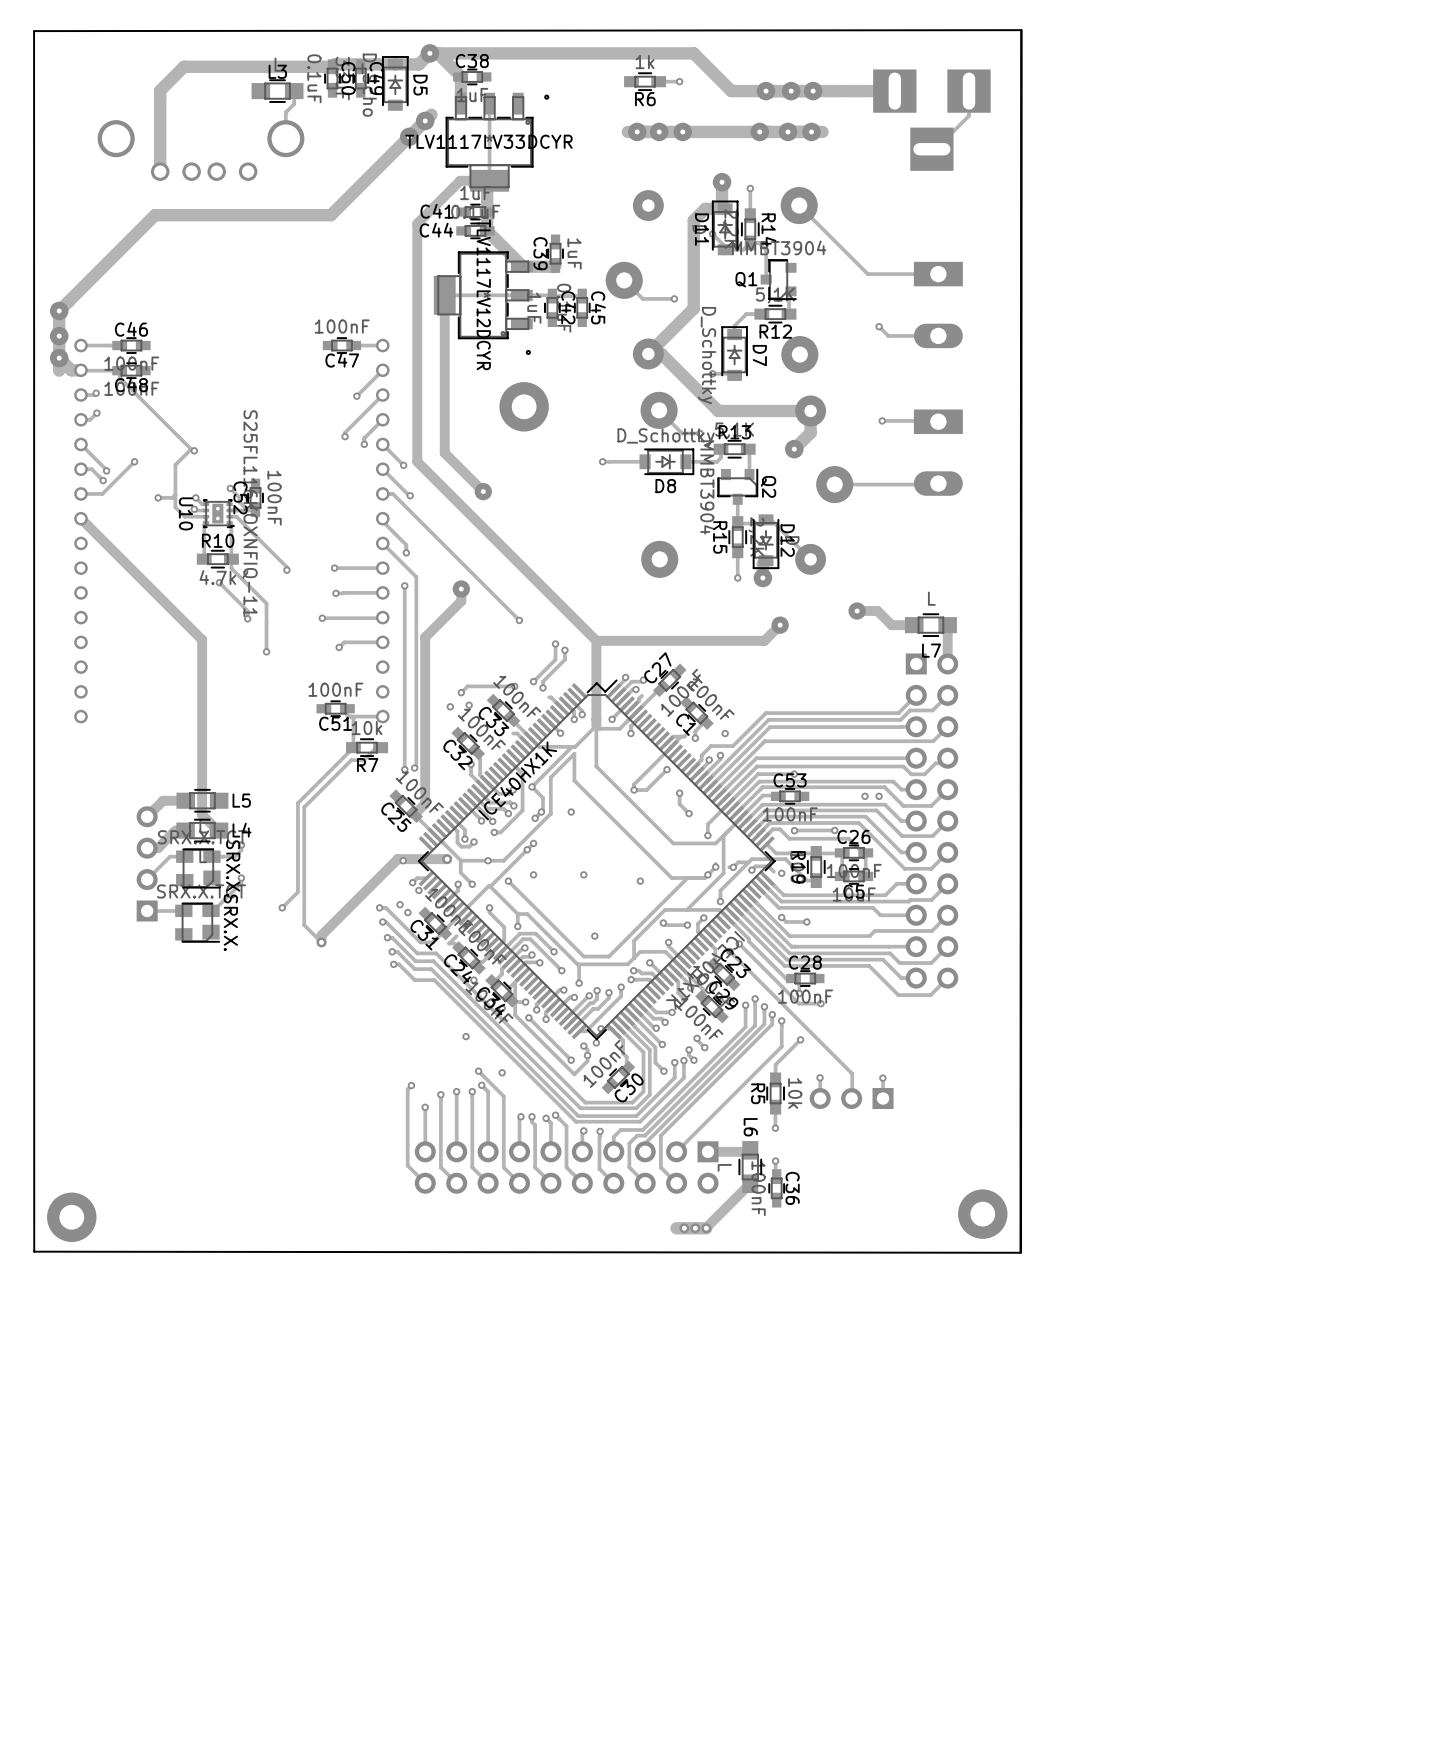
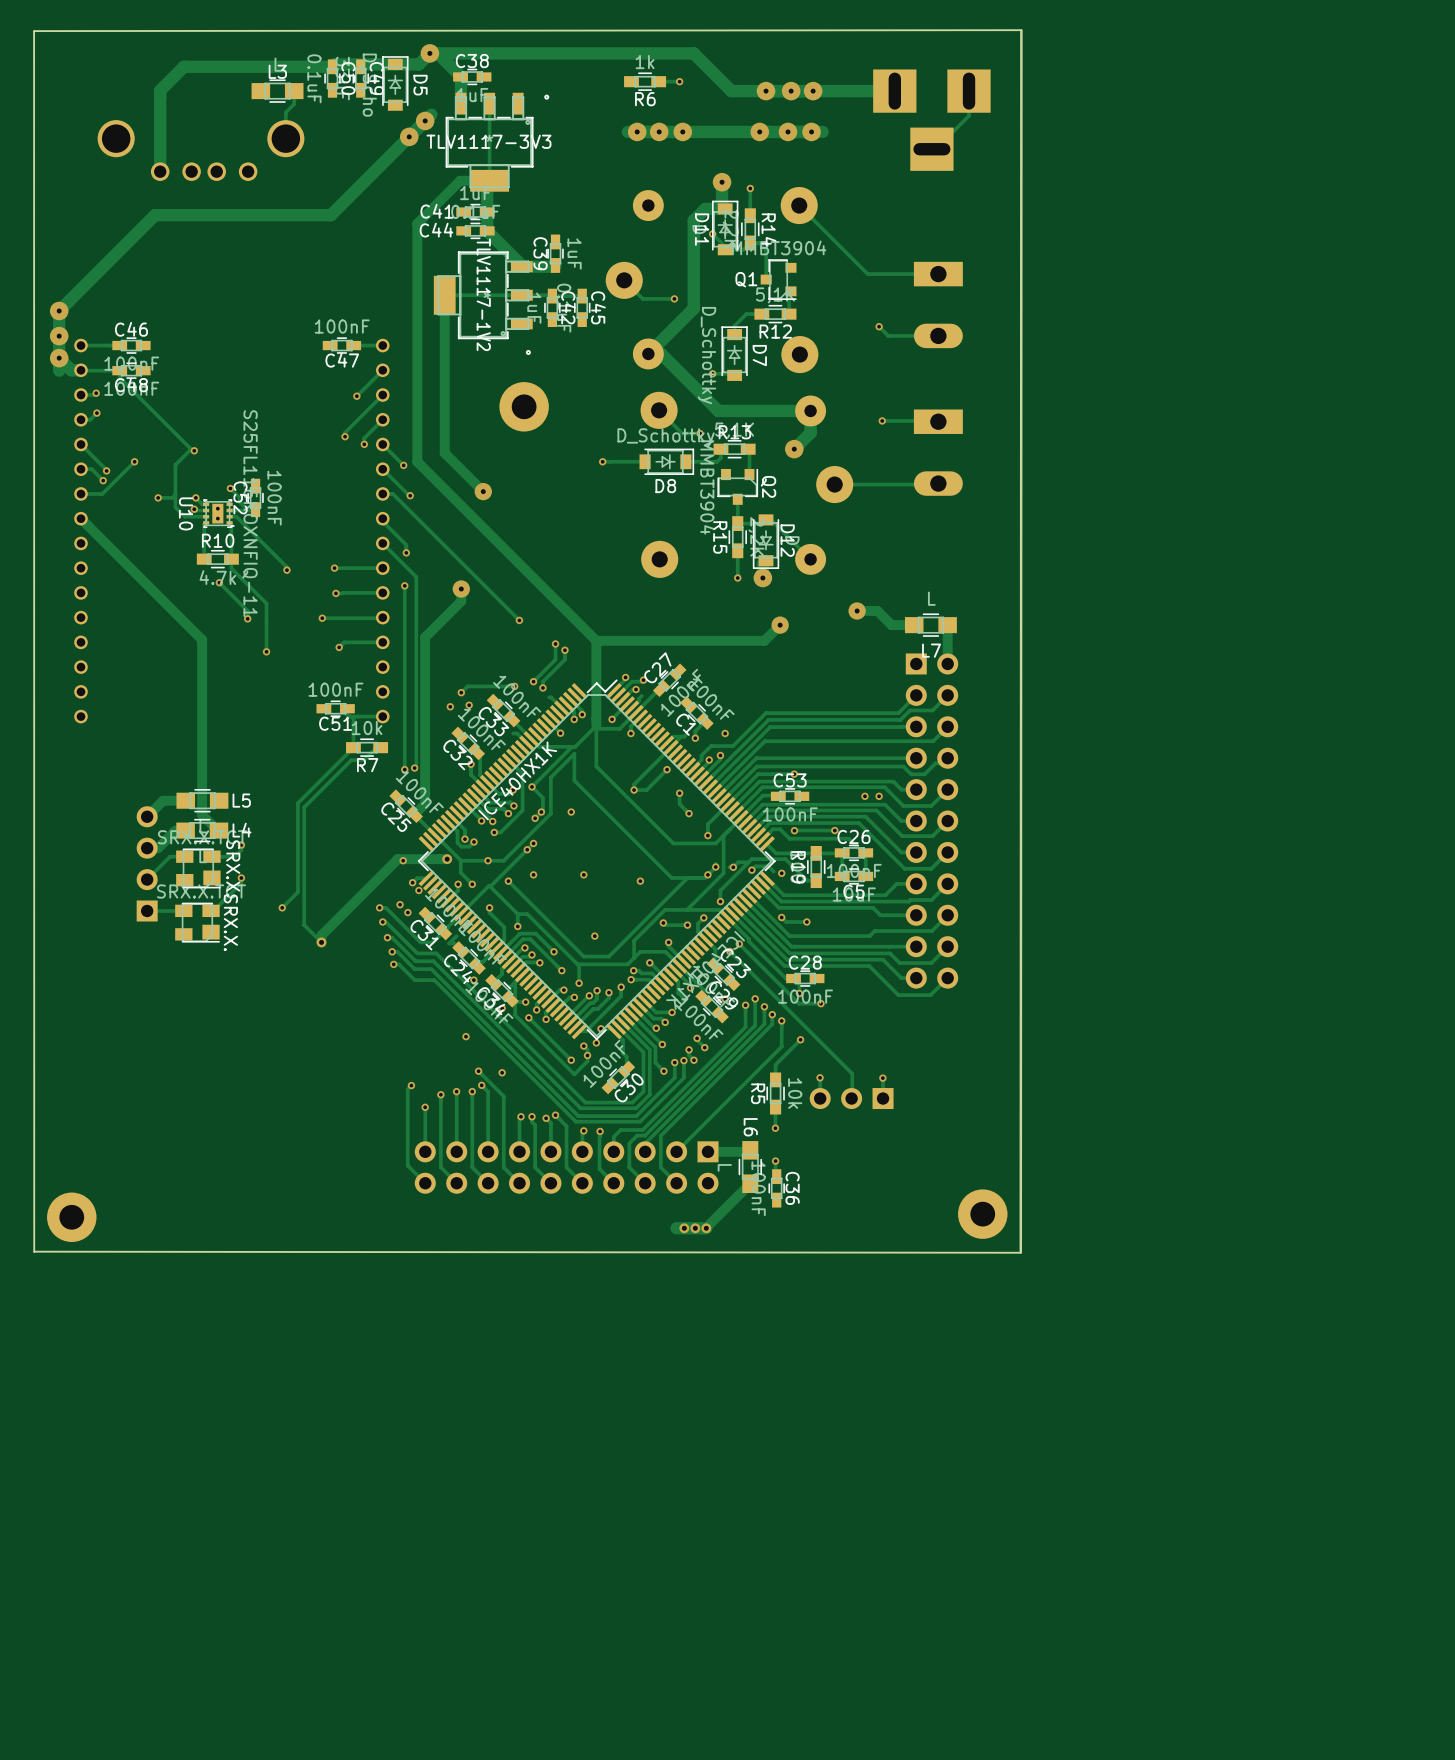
part value: TLV1117LV33DCYR (488, 141) -> TLV1117-3V3 (488, 141)
part value: TLV1117LV12DCYR (483, 294) -> TLV1117-1V2 (483, 294)

